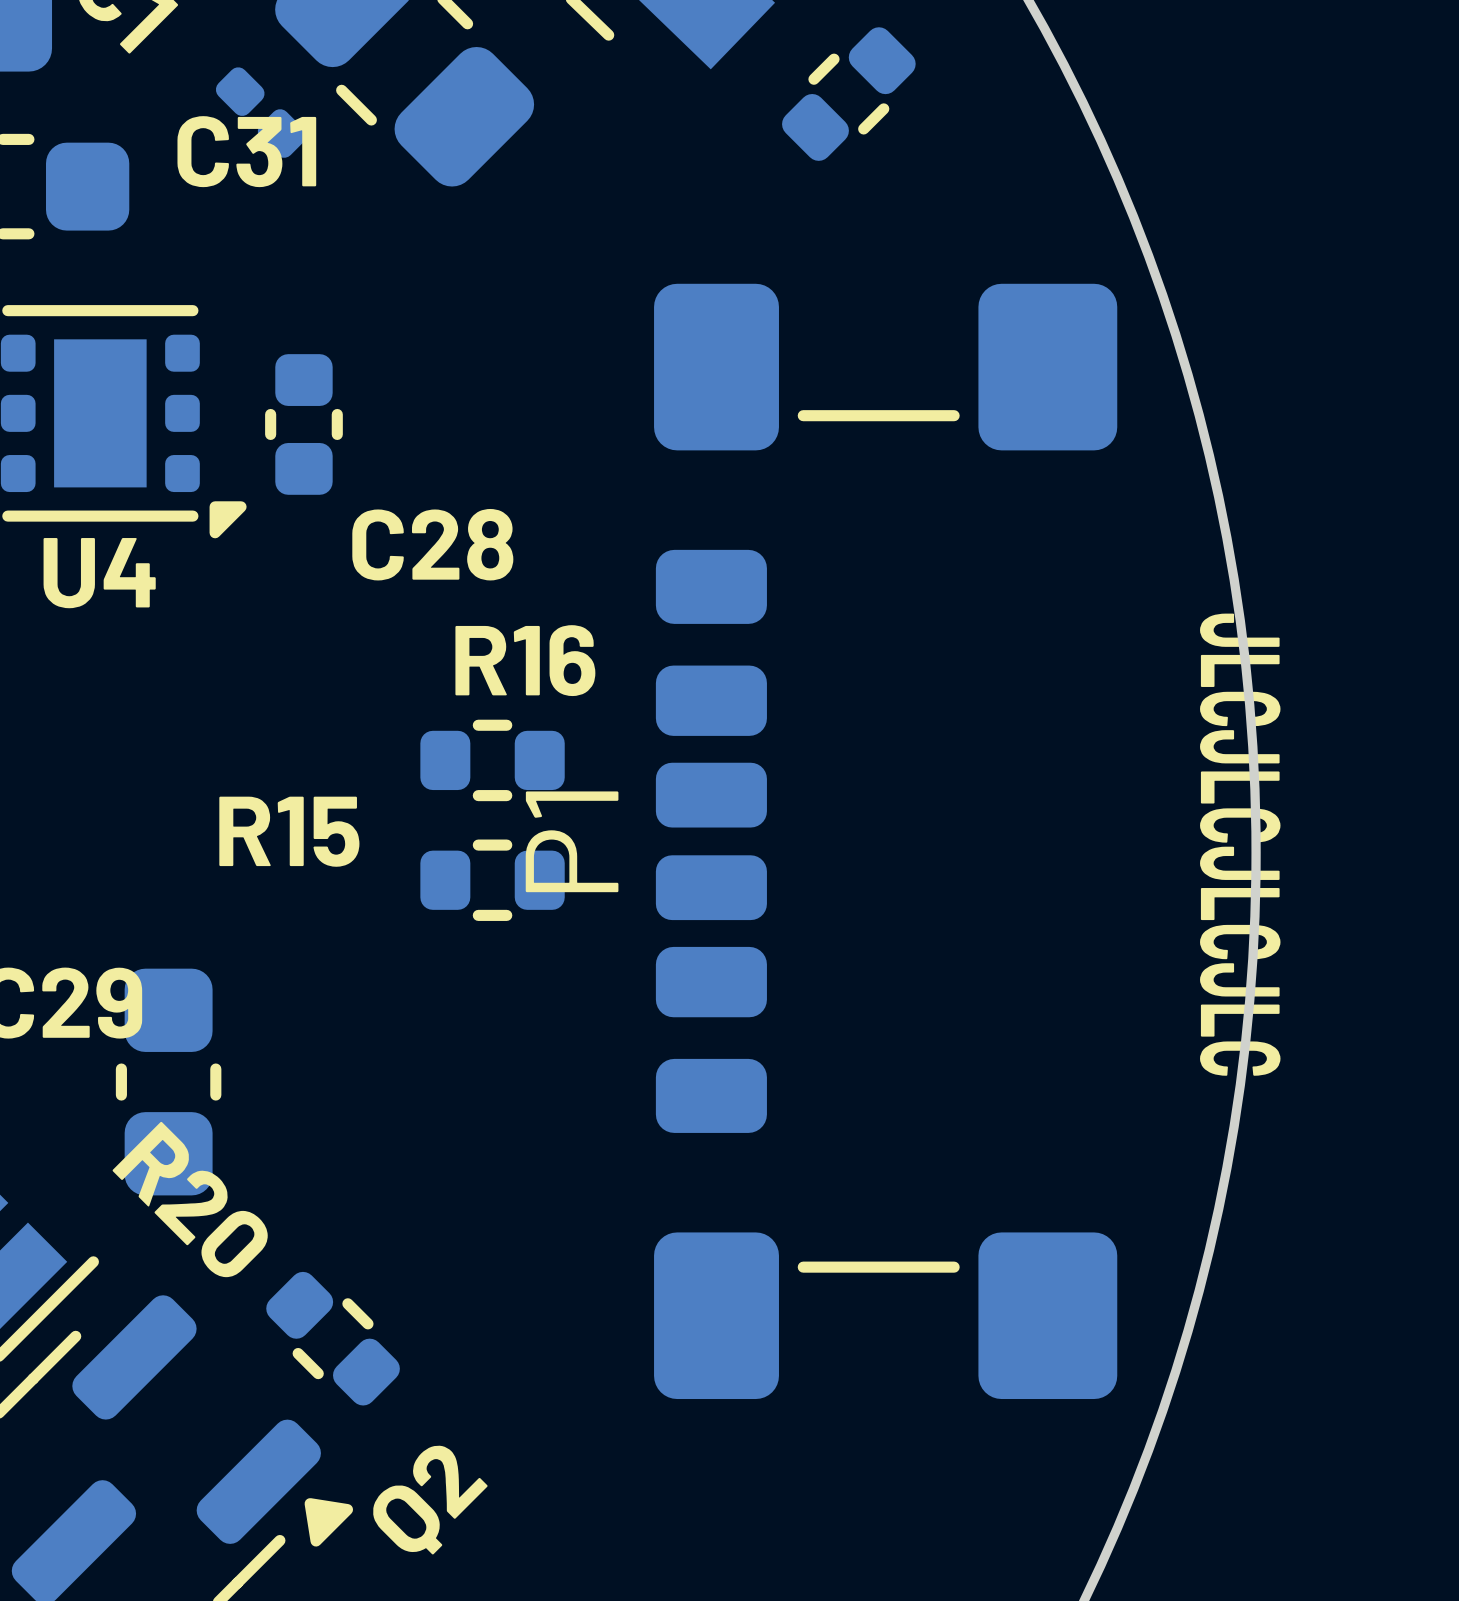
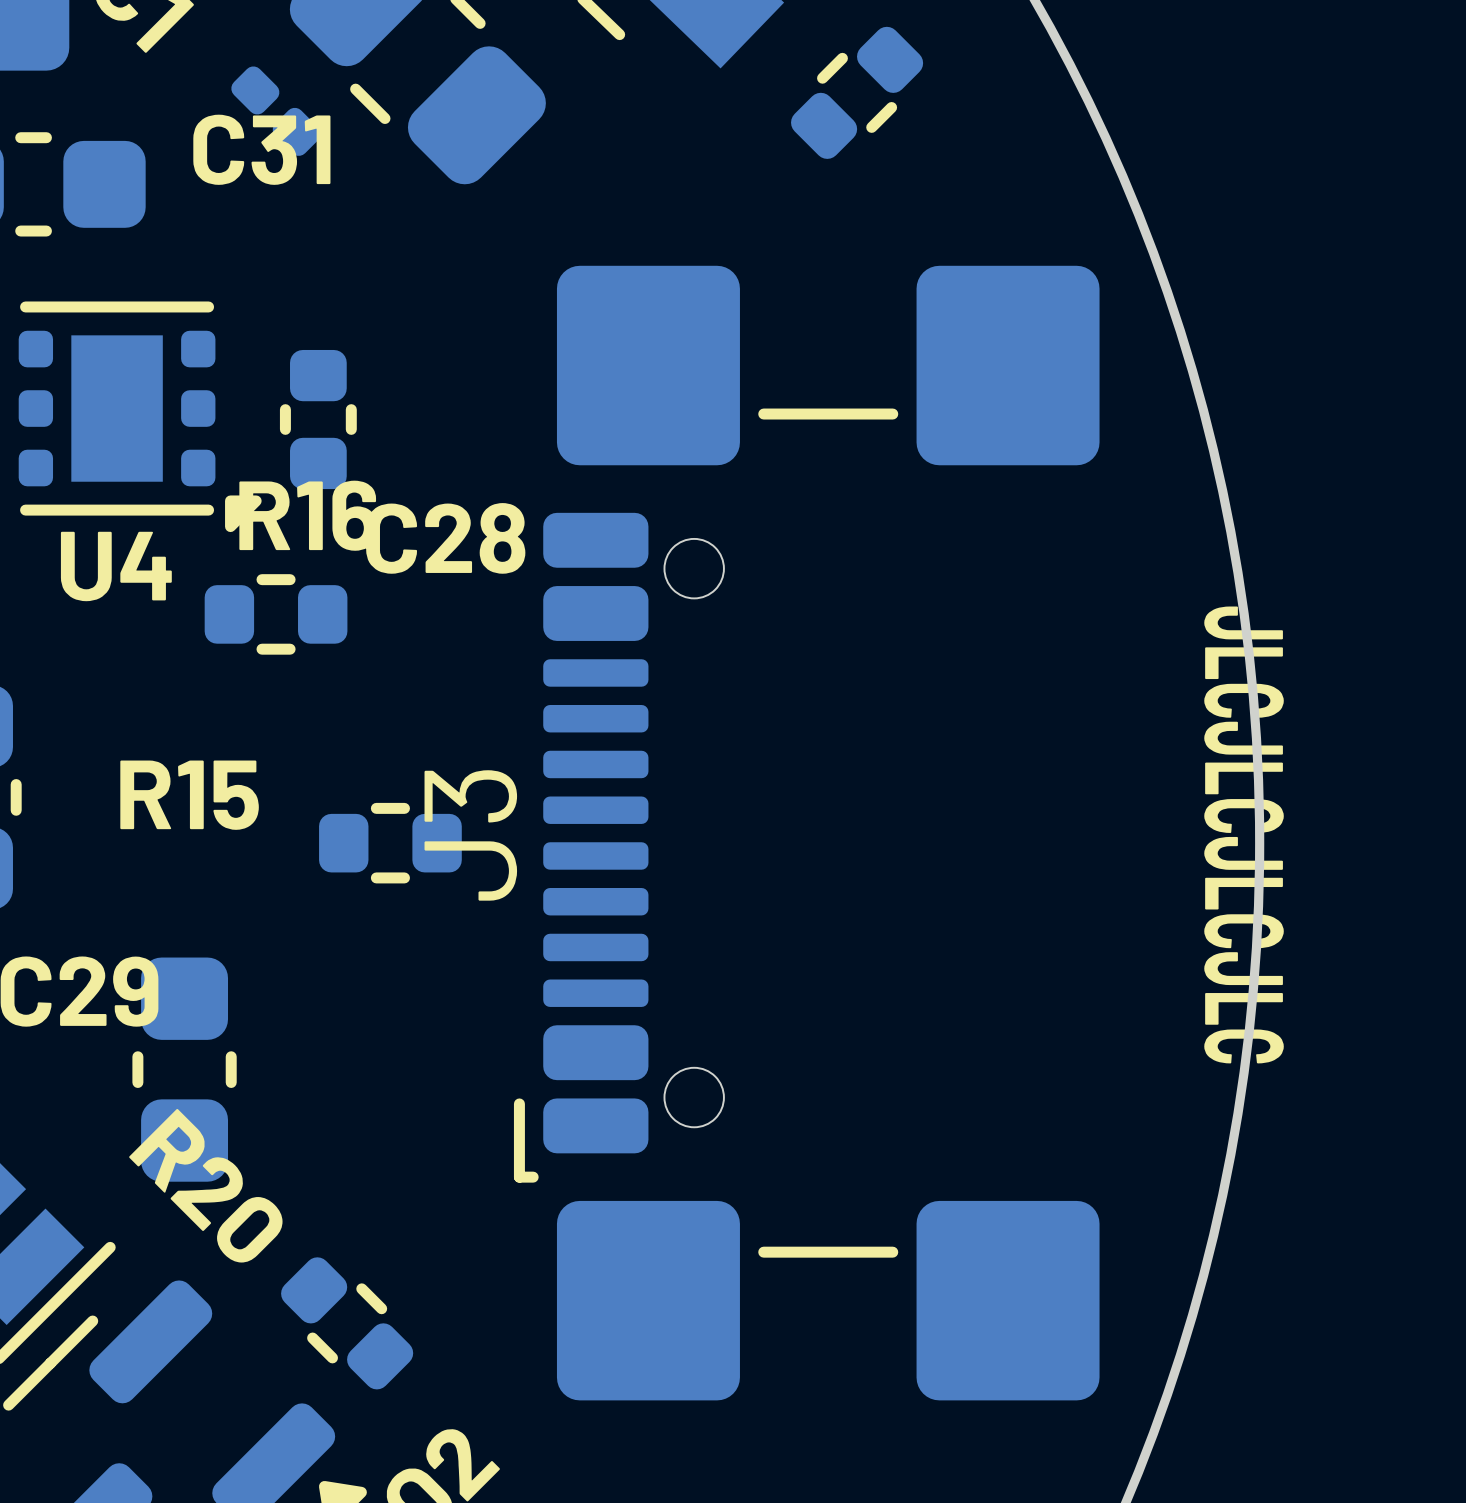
R16 position: (492, 760) -> (276, 614)
P1: (885, 841) -> none
J3: none -> (806, 833)
R15 position: (492, 880) -> (390, 843)

